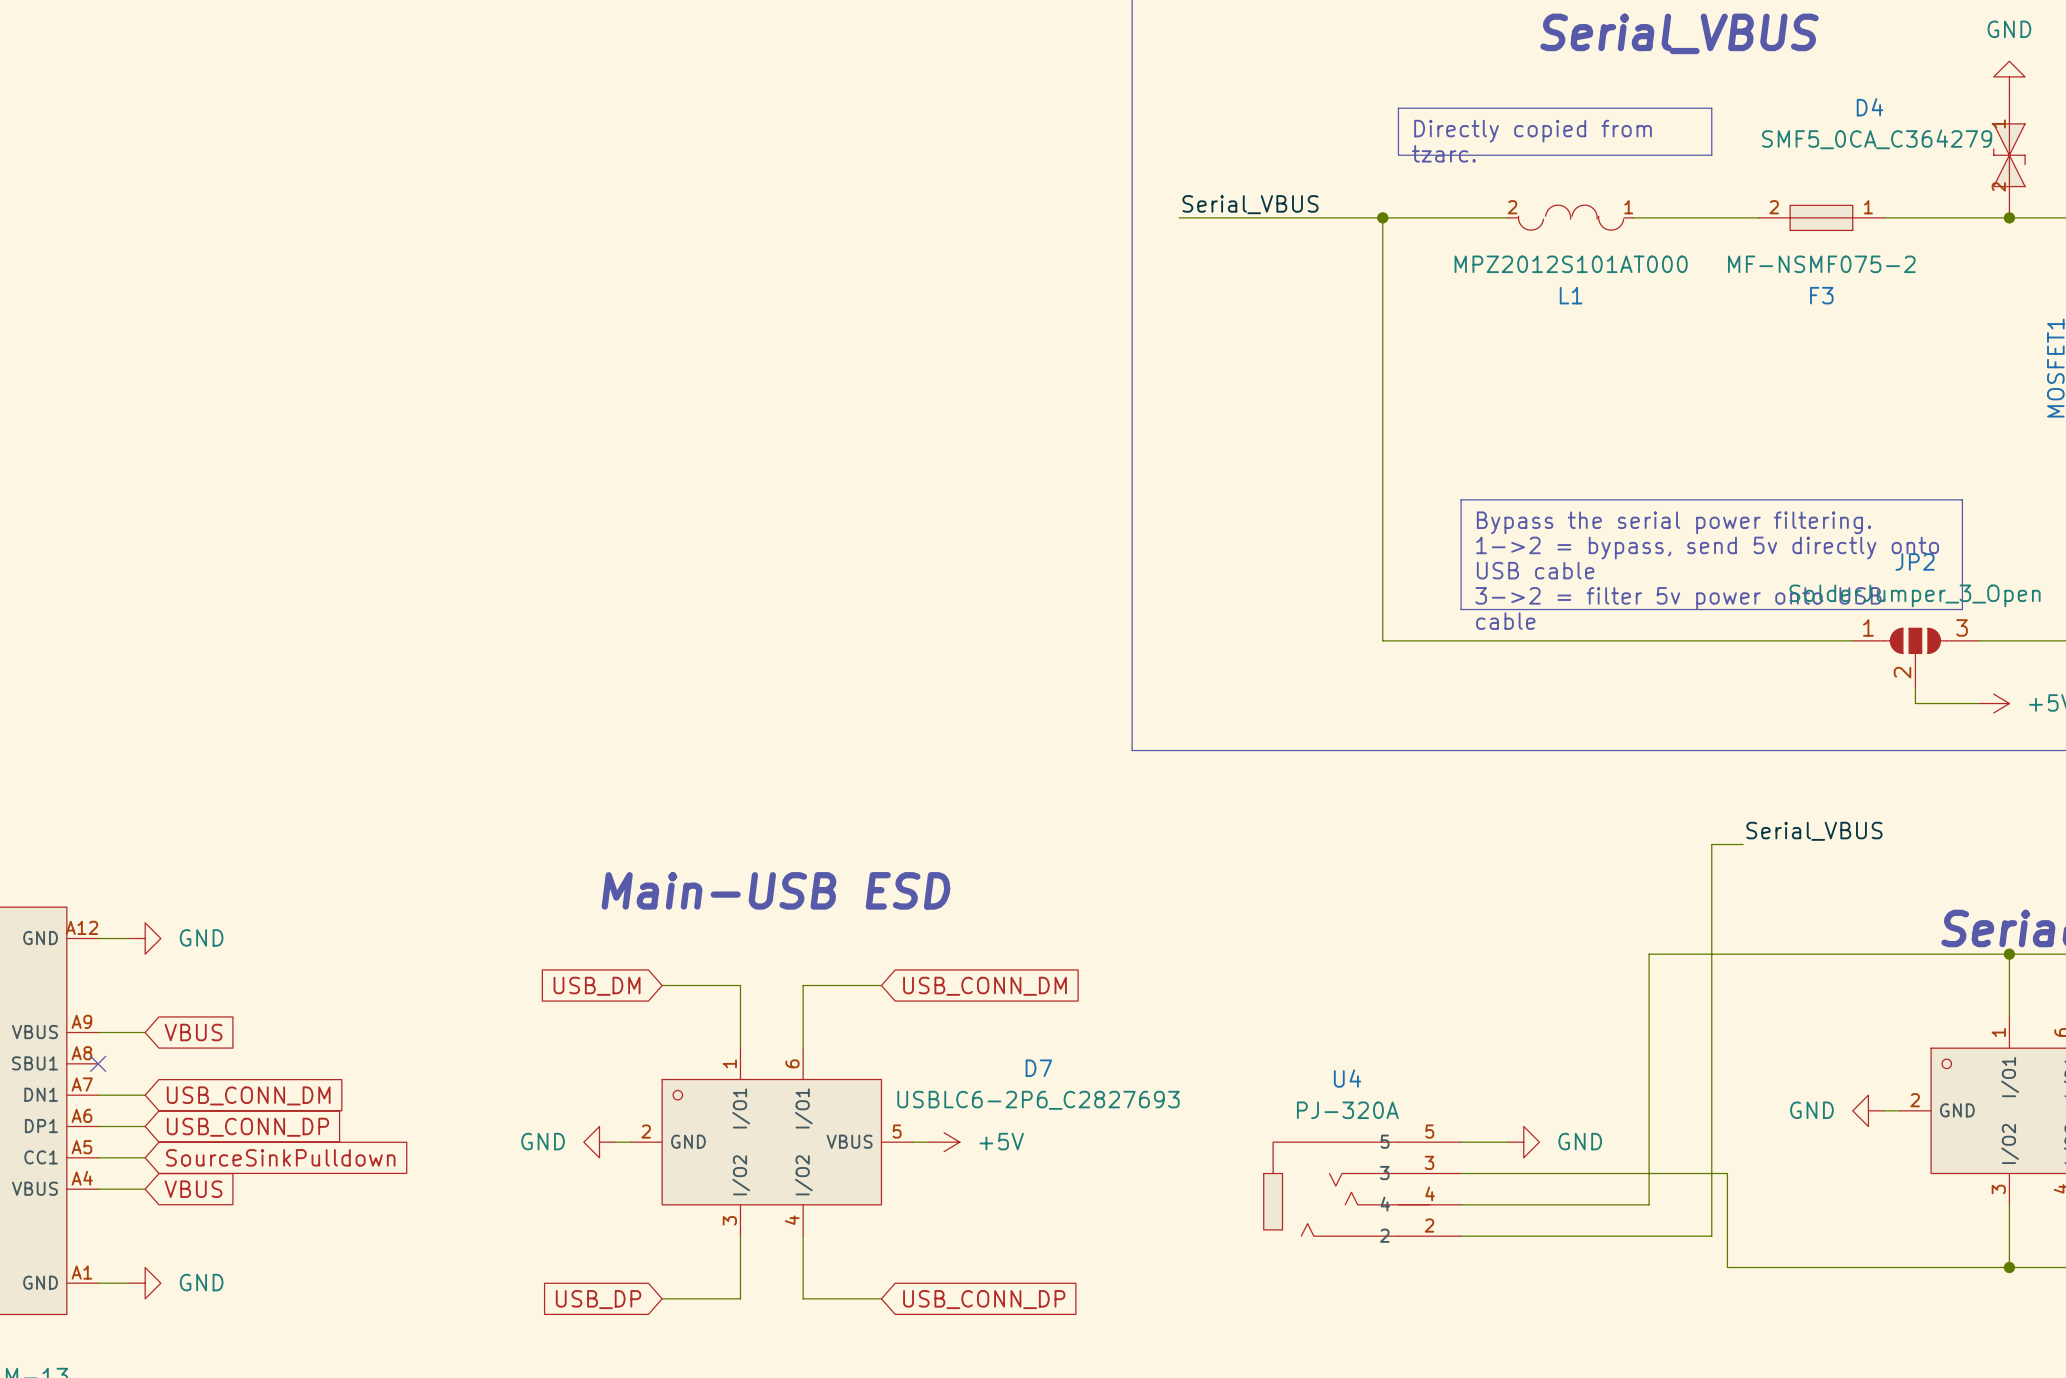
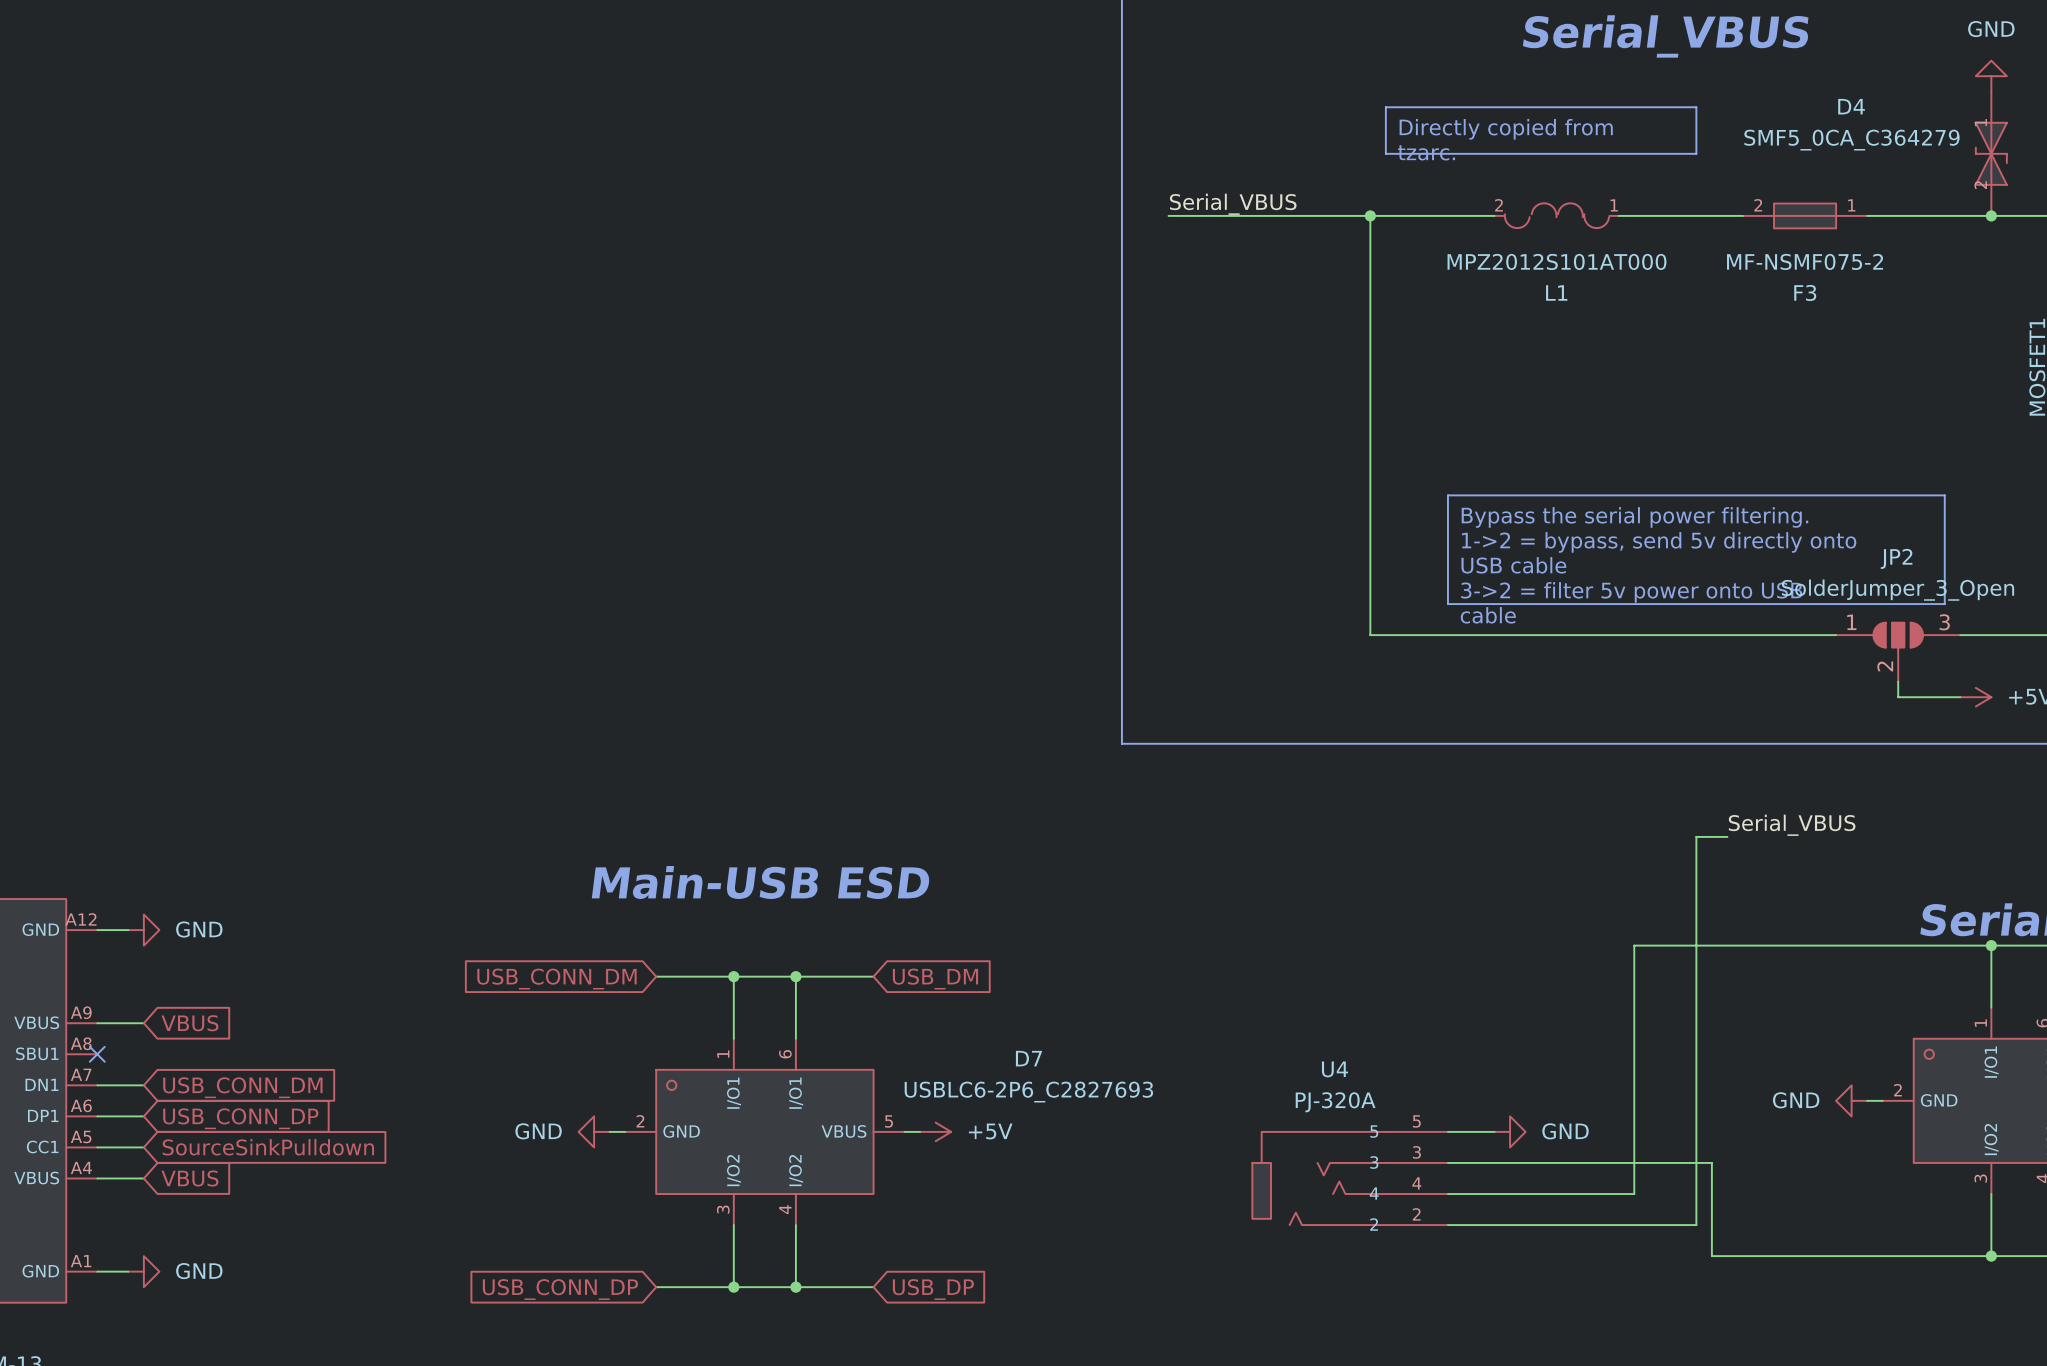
wire: none -> (733, 976) (795, 976)
junction: none -> (733, 976)
junction: none -> (795, 976)
global label: USB_DM (597, 986) -> USB_CONN_DM (556, 979)
global label: USB_CONN_DM (985, 986) -> USB_DM (935, 979)
wire: none -> (733, 1287) (795, 1287)
junction: none -> (733, 1287)
junction: none -> (795, 1287)
global label: USB_DP (598, 1299) -> USB_CONN_DP (560, 1289)
global label: USB_CONN_DP (984, 1299) -> USB_DP (933, 1289)

